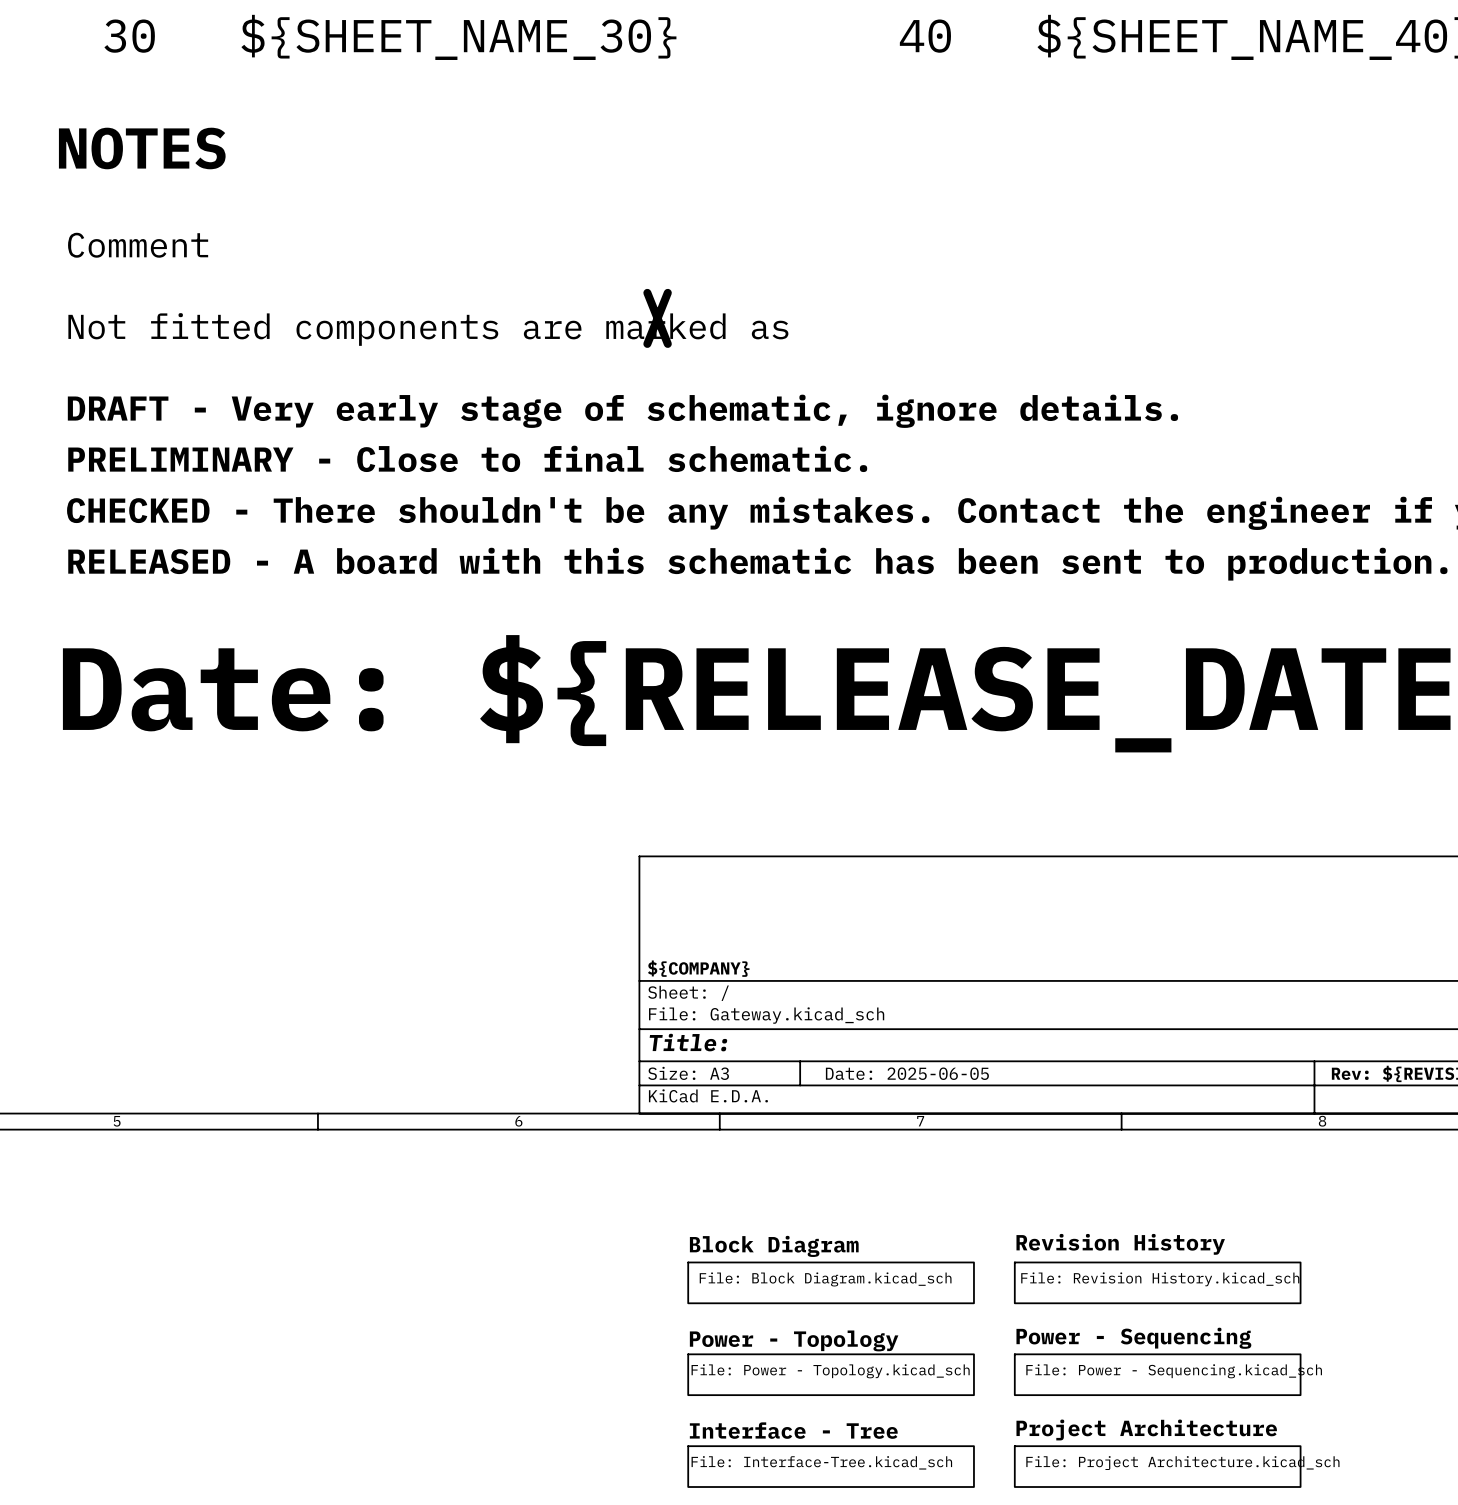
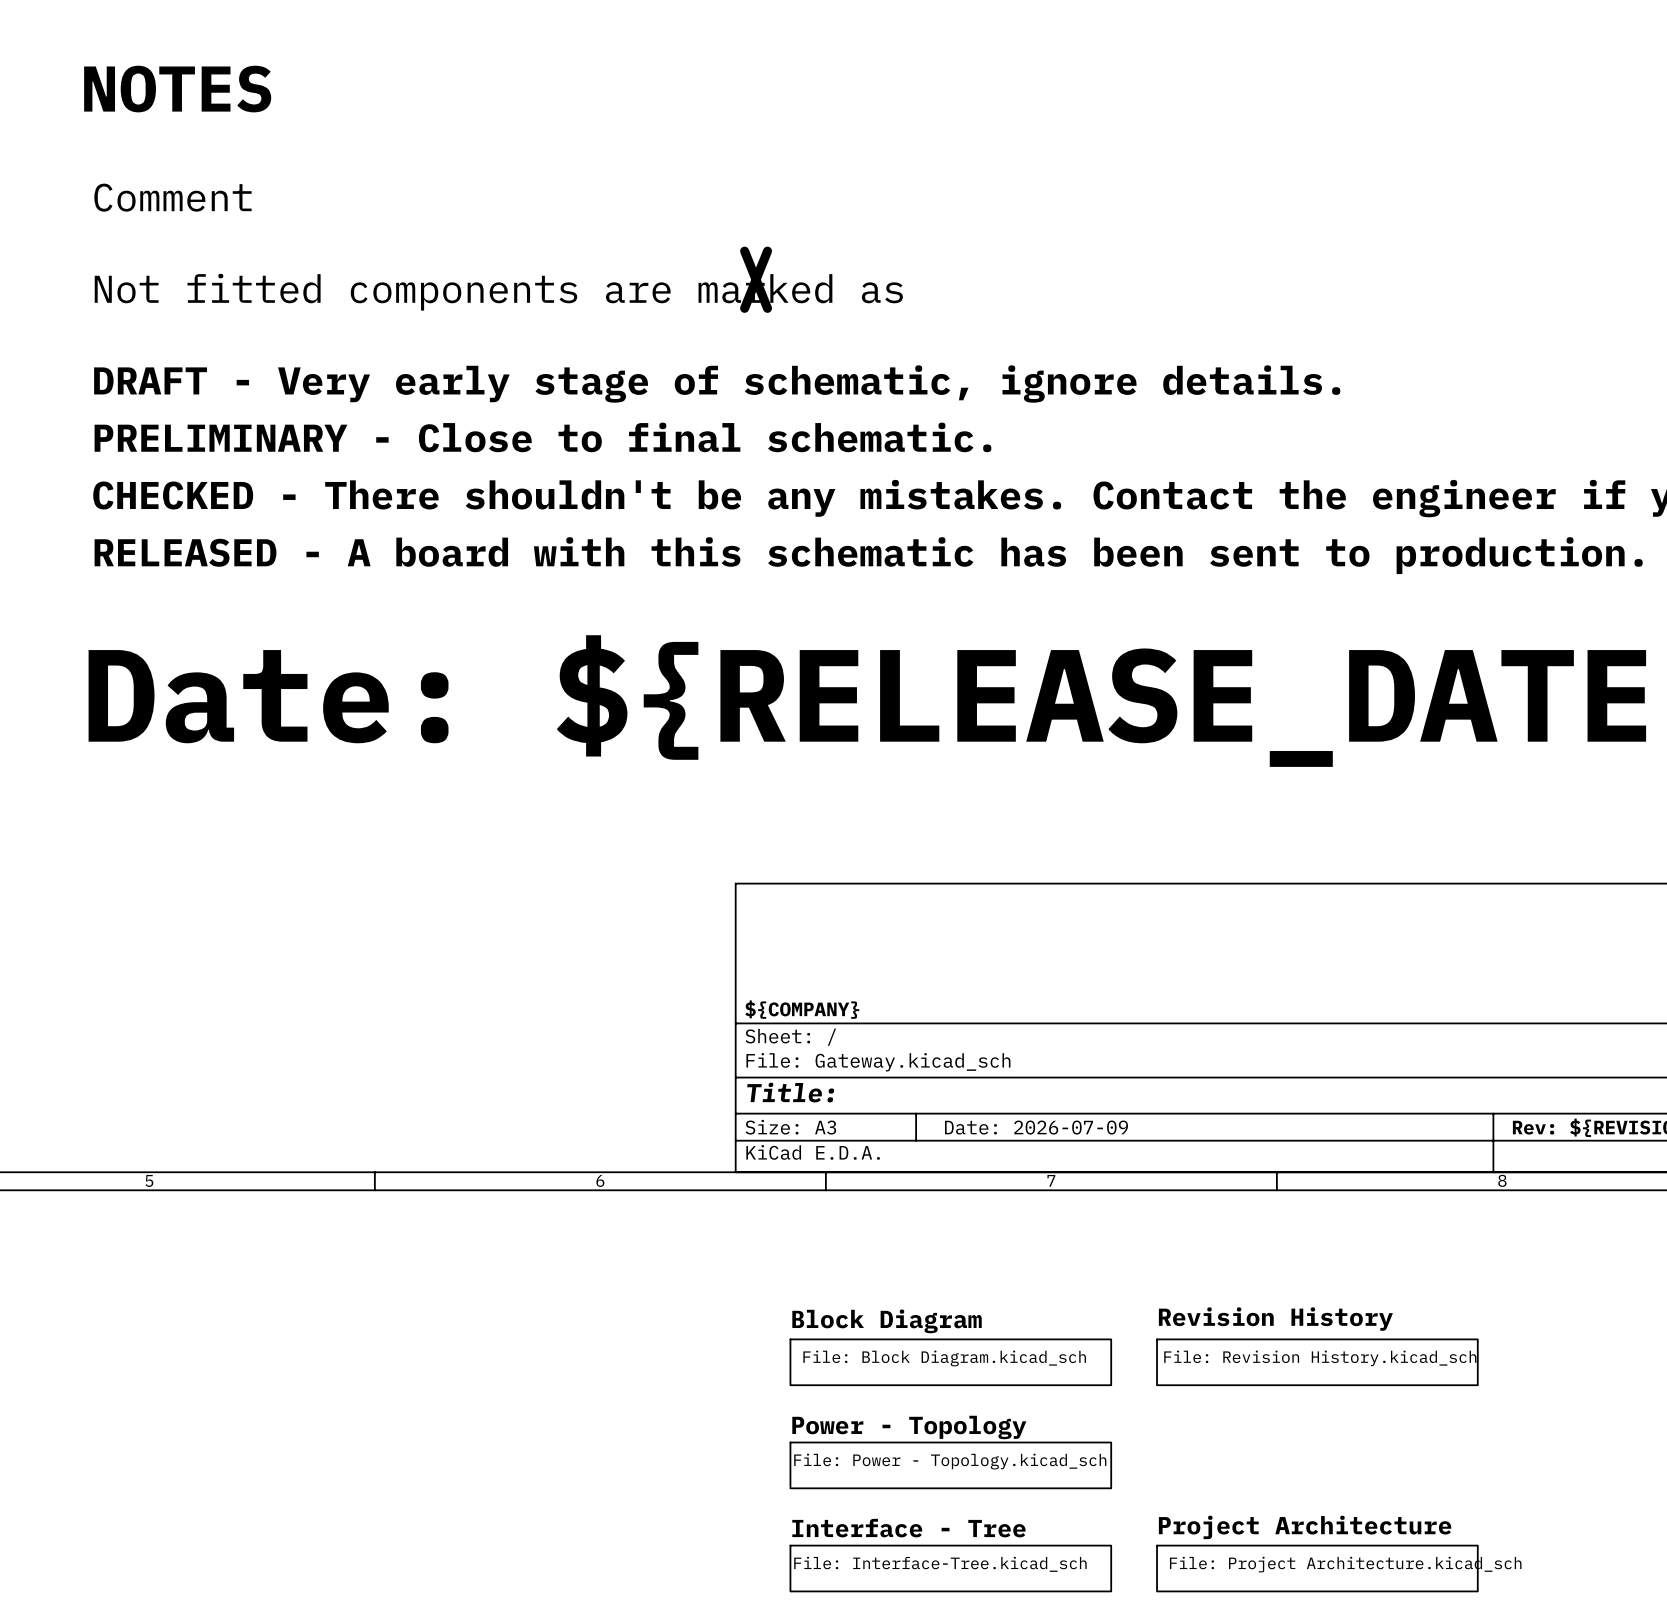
title block: Date: 2025-06-05 (907, 1073) -> Date: 2026-07-09 (1036, 1127)
sheet Power - Sequencing: File: Power - Sequencing.kicad_sch (1157, 1374) -> none

